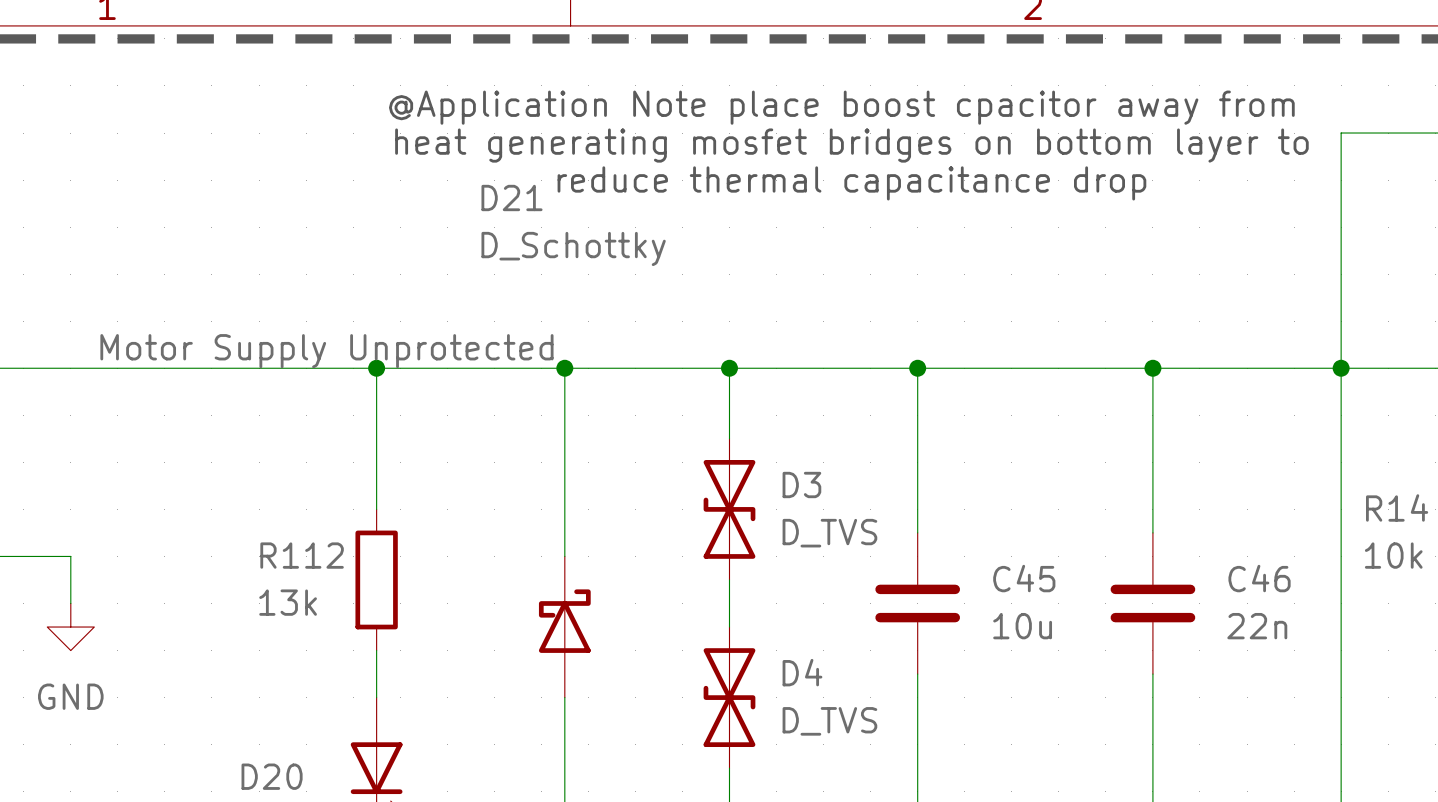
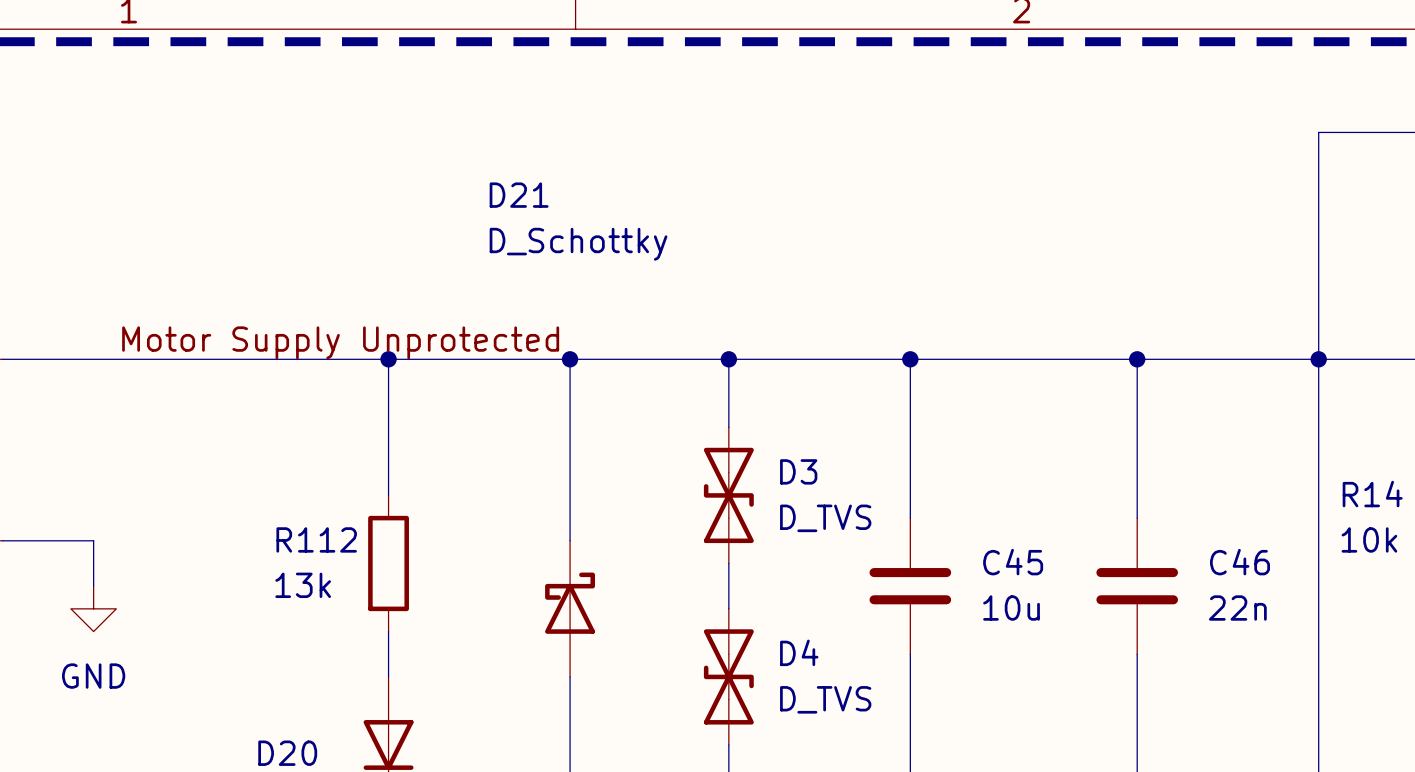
text: @Application Note place boost cpacitor away from (841, 107) -> none
text: heat generating mosfet bridges on bottom layer to (851, 145) -> none
text: reduce thermal capacitance drop (851, 183) -> none

